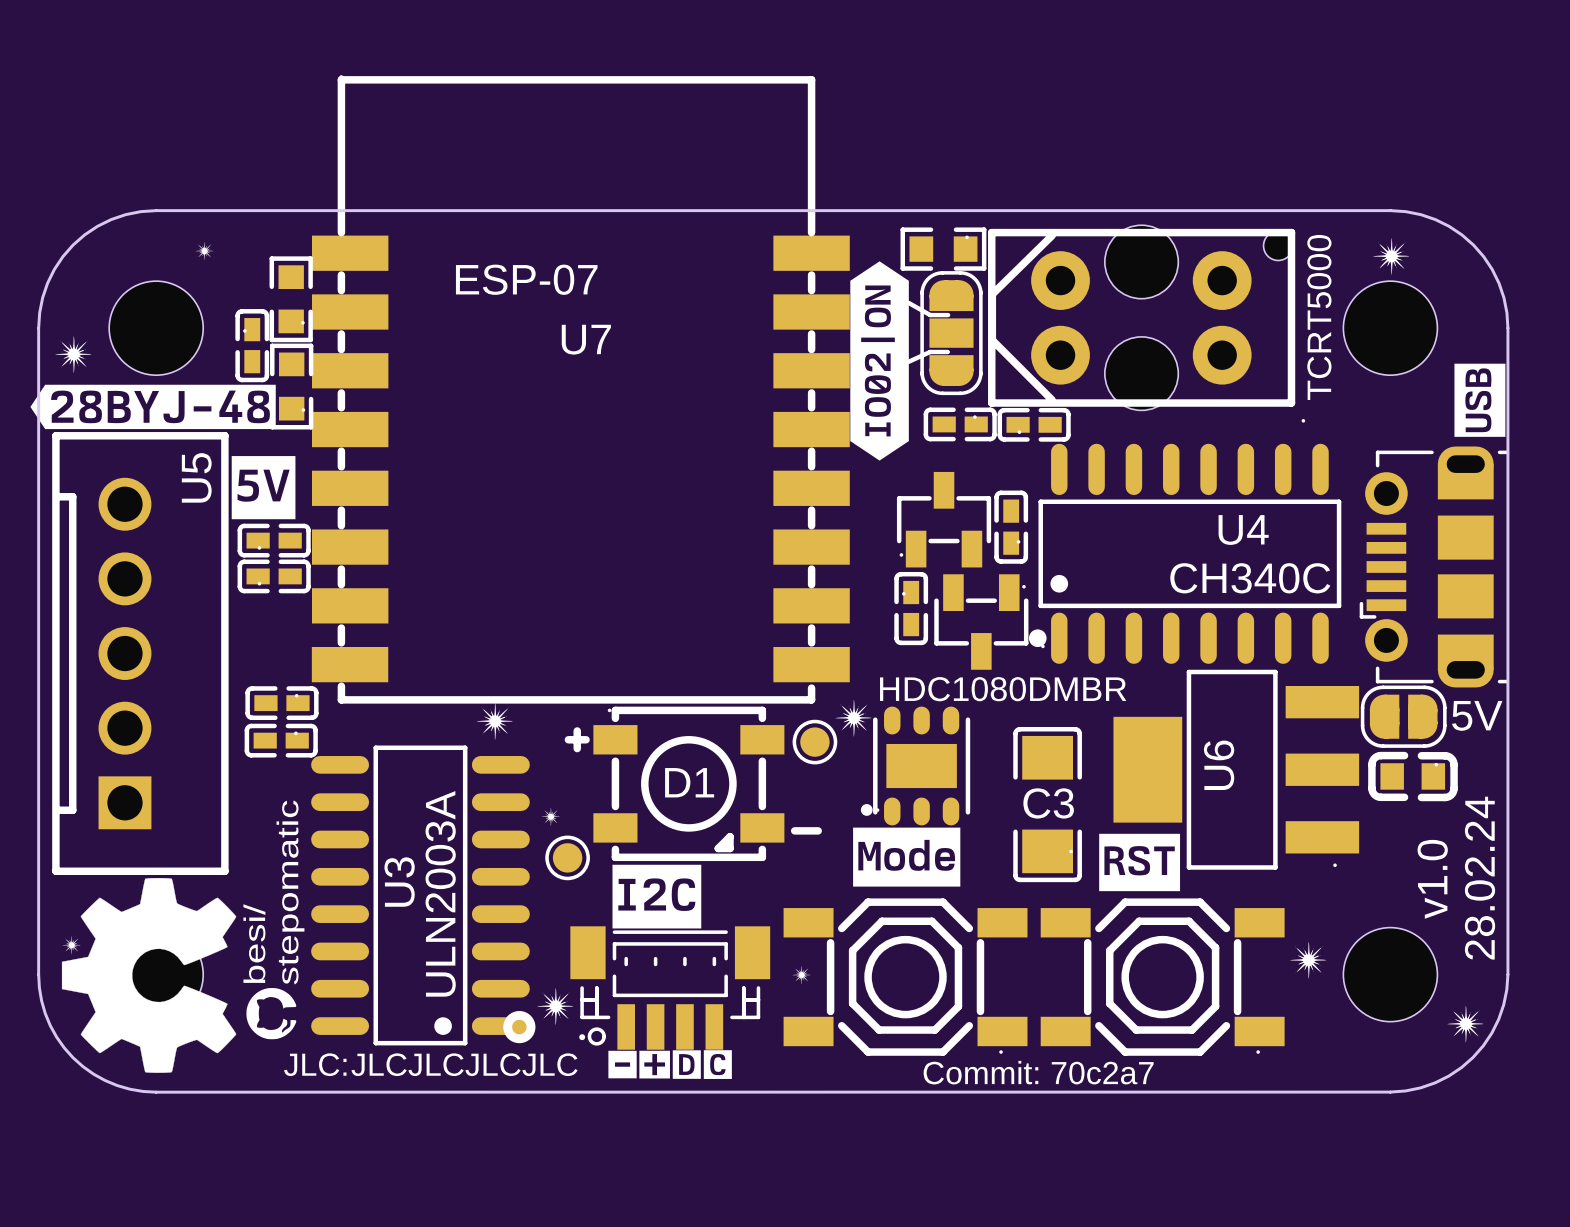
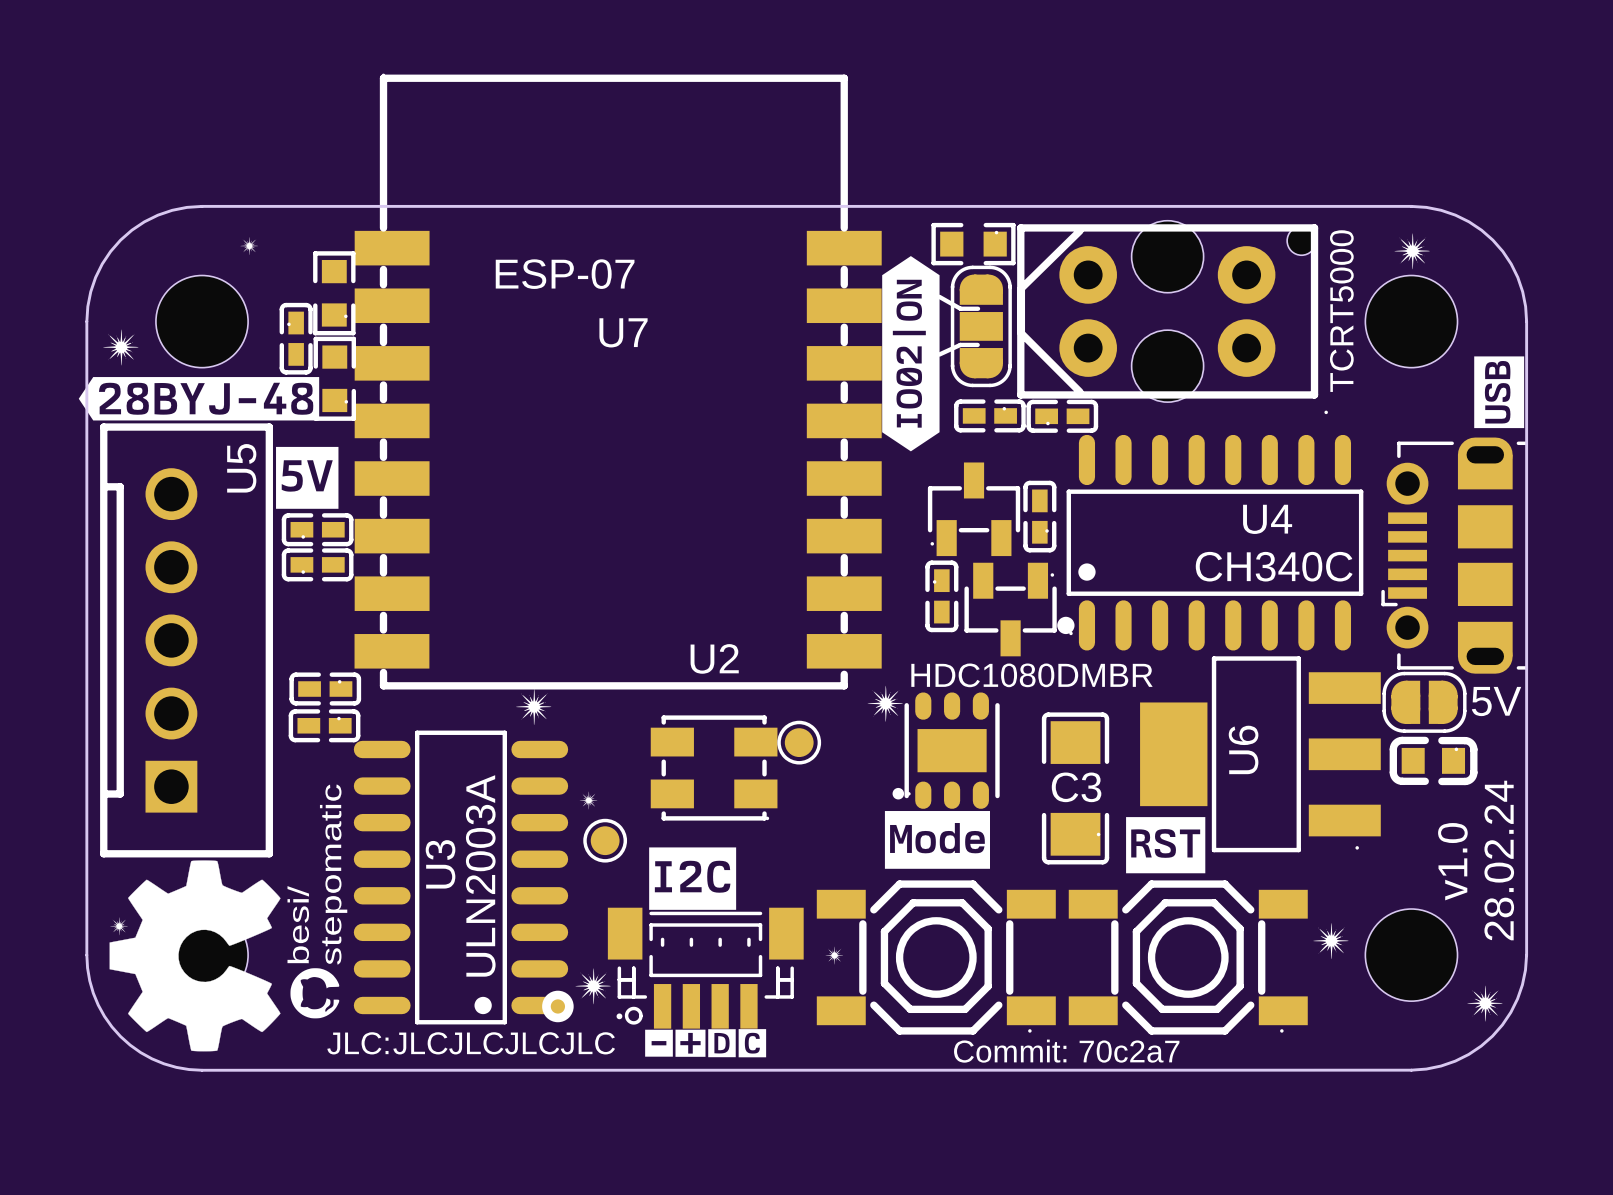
part position: (814, 742) -> (799, 742)
U2: none -> (714, 767)
D1: (693, 783) -> none

